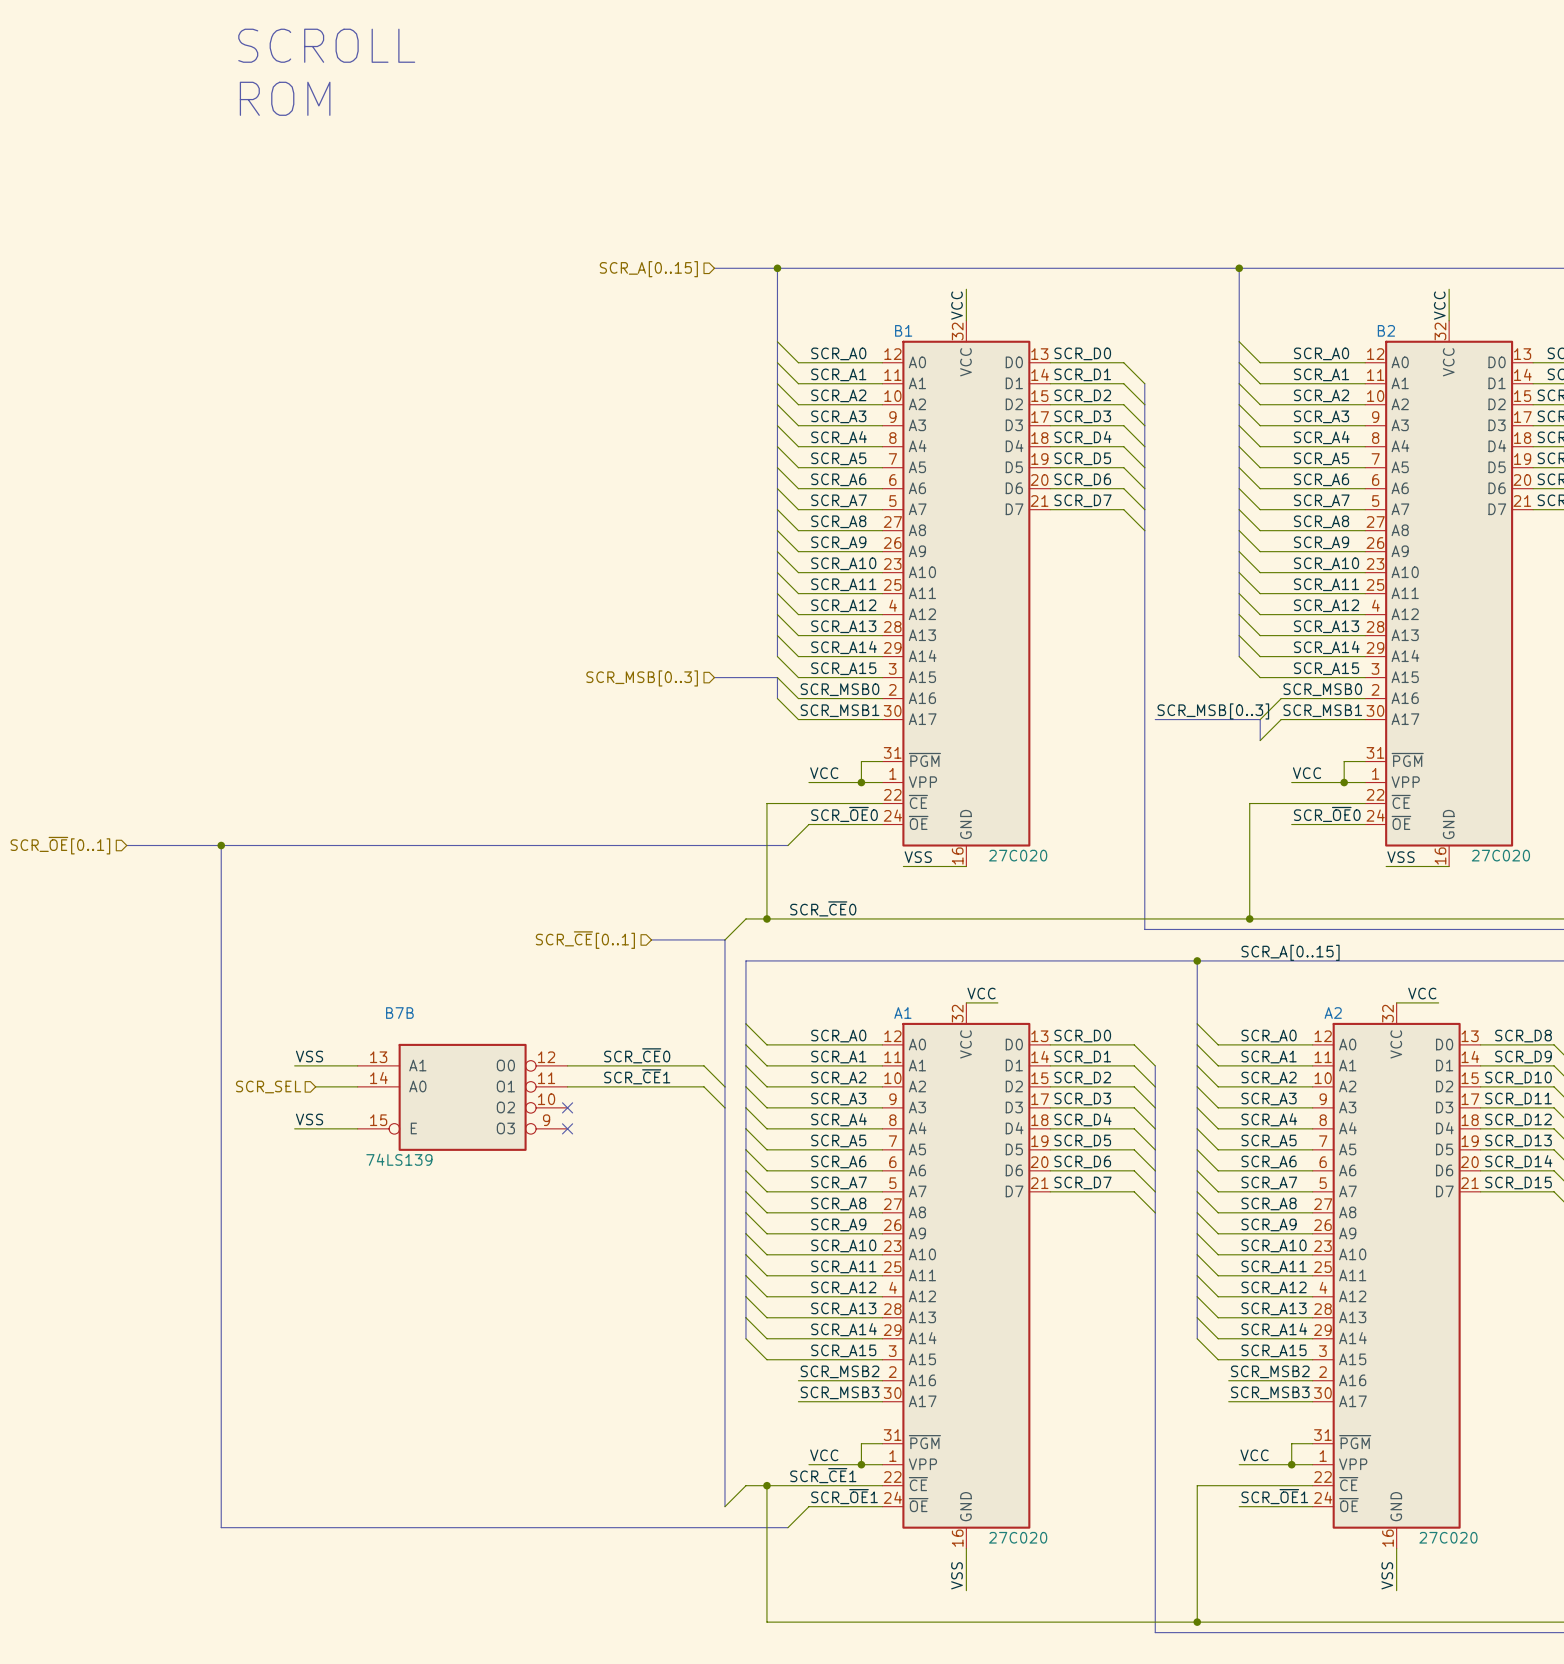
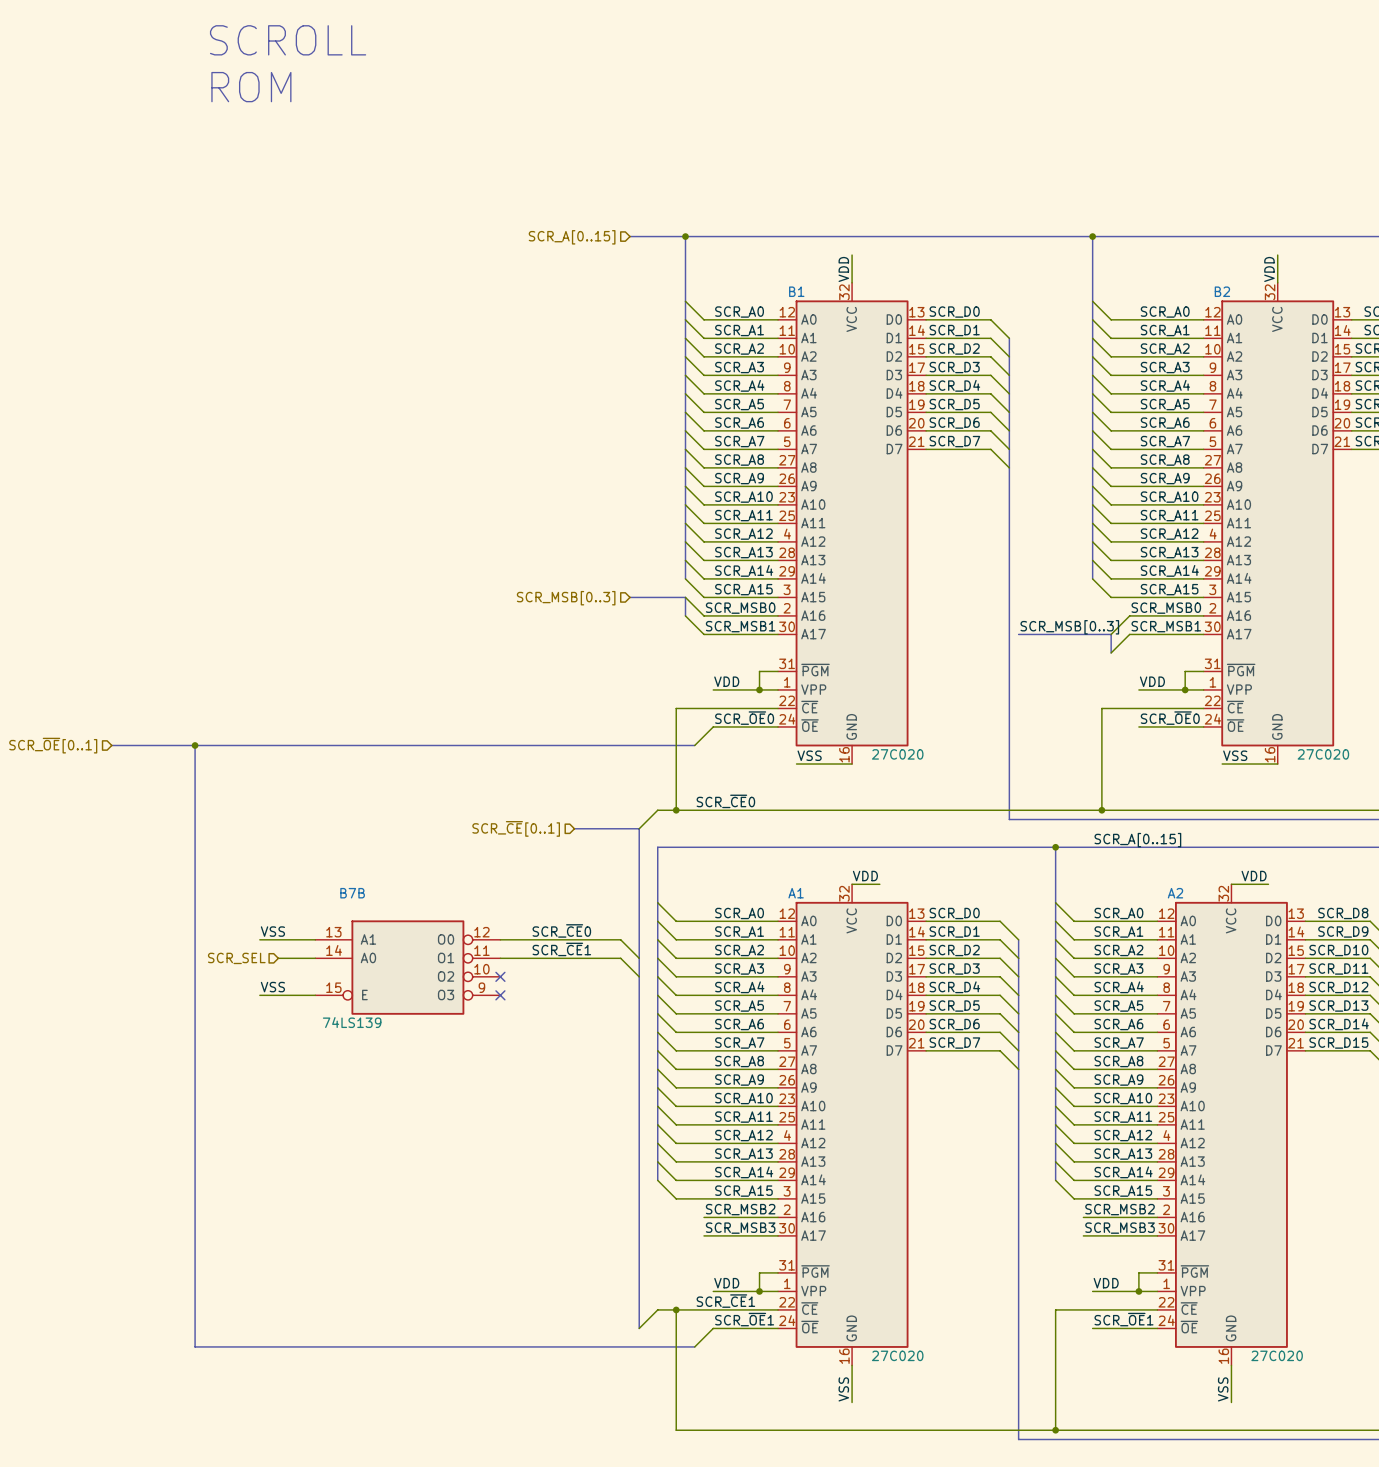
label: VCC (957, 305) -> VDD (843, 269)
label: VCC (1439, 305) -> VDD (1269, 269)
label: VCC (824, 773) -> VDD (726, 681)
label: VCC (1307, 773) -> VDD (1152, 681)
label: VCC (981, 993) -> VDD (865, 876)
label: VCC (1422, 993) -> VDD (1254, 876)
label: VCC (824, 1455) -> VDD (726, 1283)
label: VCC (1254, 1455) -> VDD (1106, 1283)

